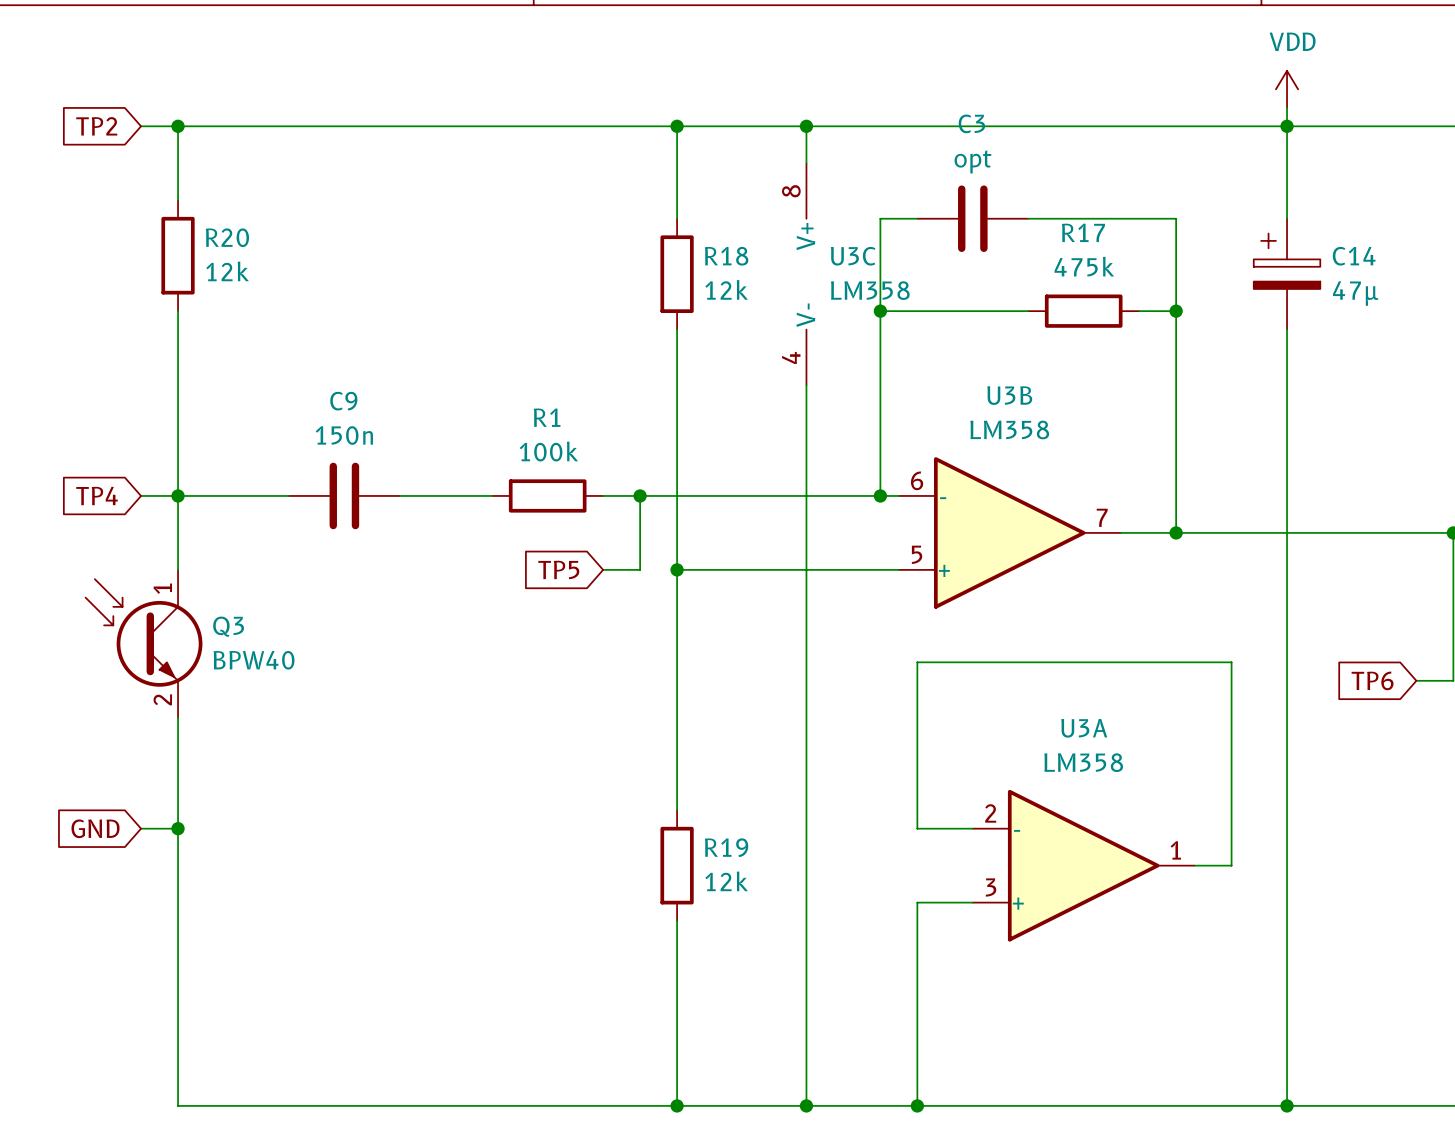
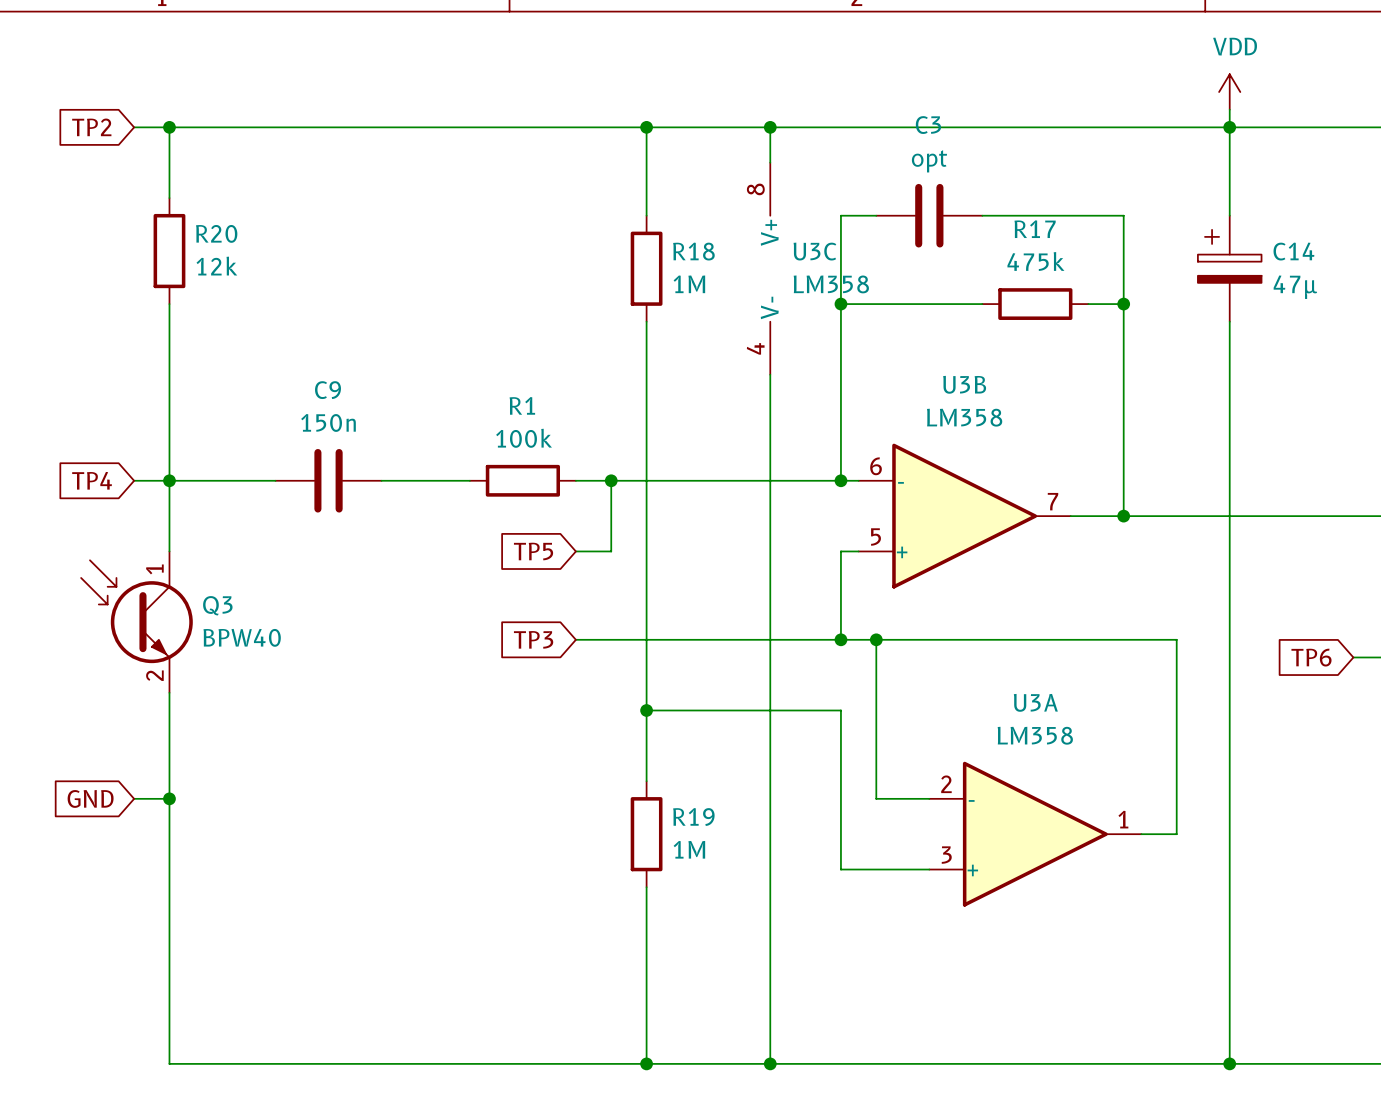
R18 value: 12k (726, 289) -> 1M (689, 284)
wire: (677, 569) (880, 569) -> (840, 639) (840, 551)
junction: (677, 569) -> none
global label: none -> TP3 (533, 639)
wire: none -> (575, 639) (876, 639)
junction: none -> (840, 639)
junction: none -> (876, 639)
junction: none -> (646, 710)
R19 value: 12k (726, 881) -> 1M (689, 849)
wire: (917, 902) (917, 1105) -> (876, 869) (840, 869) (840, 710) (646, 710)
junction: (917, 1105) -> none

